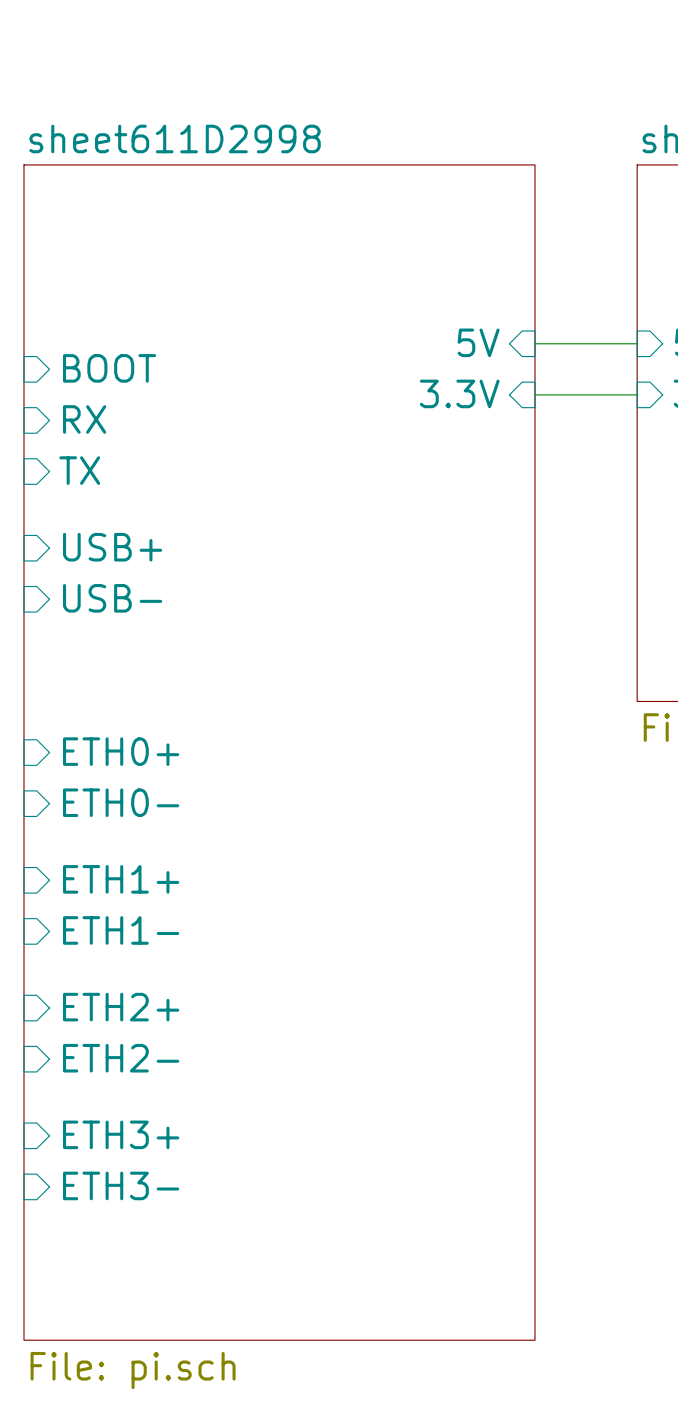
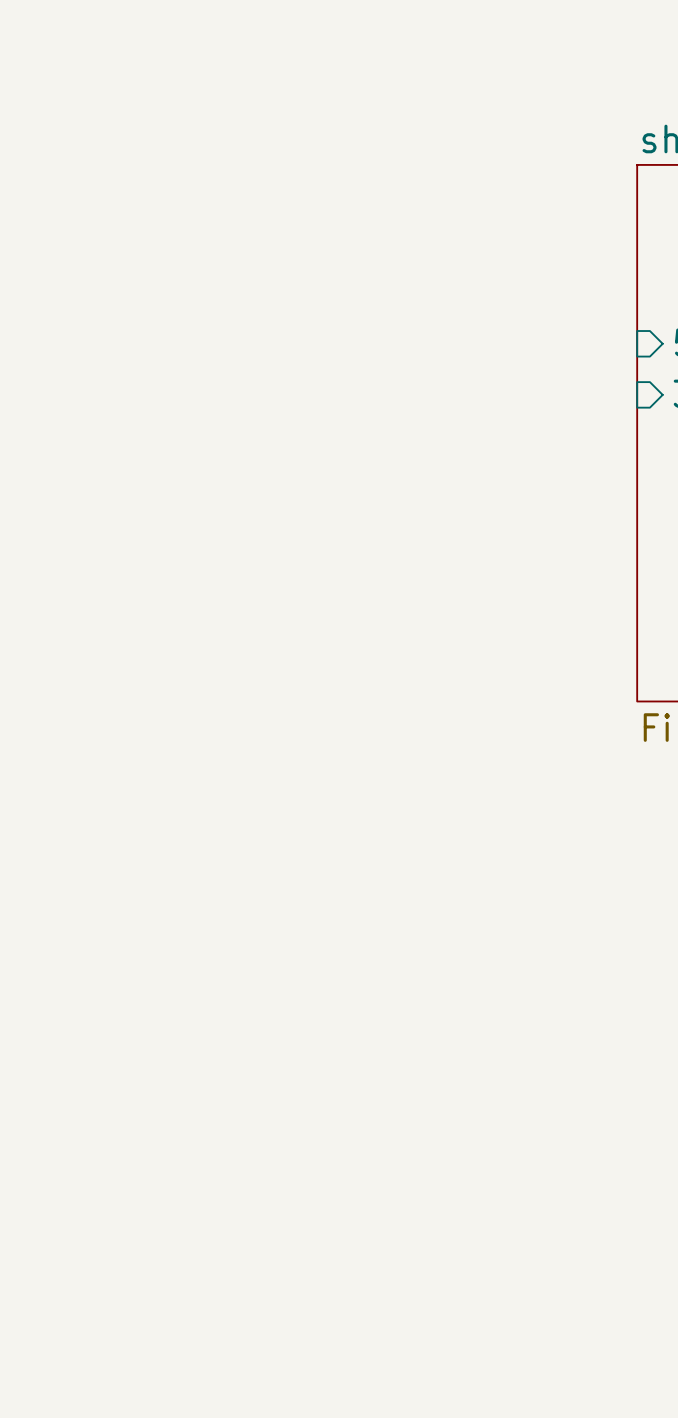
sheet pin: 5V (478, 342) -> none
wire: (534, 343) (637, 343) -> none
sheet pin: BOOT (109, 368) -> none
sheet pin: 3.3V (459, 393) -> none
wire: (534, 394) (637, 394) -> none
sheet pin: RX (84, 419) -> none
sheet pin: TX (79, 470) -> none
sheet pin: USB+ (112, 547) -> none
sheet pin: USB- (112, 598) -> none
sheet pin: ETH0+ (121, 751) -> none
sheet sheet611D2998: File: pi.sch (279, 752) -> none
sheet pin: ETH0- (121, 802) -> none
sheet pin: ETH1+ (121, 879) -> none
sheet pin: ETH1- (121, 930) -> none
sheet pin: ETH2+ (121, 1007) -> none
sheet pin: ETH2- (121, 1058) -> none
sheet pin: ETH3+ (121, 1134) -> none
sheet pin: ETH3- (121, 1185) -> none

